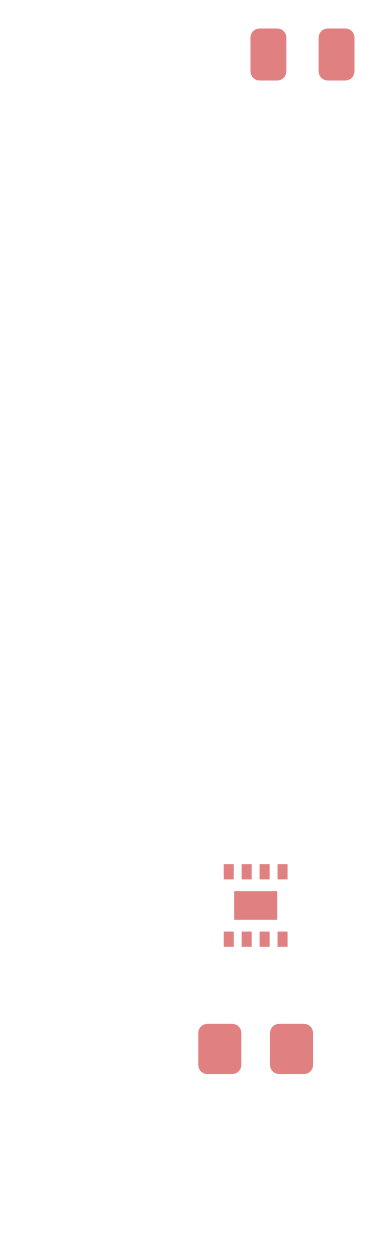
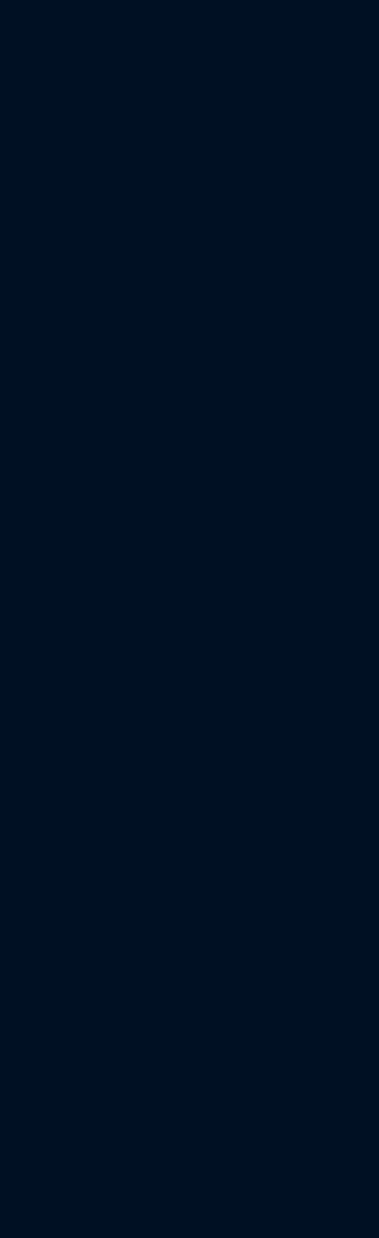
part: (302, 54) -> none
part: (255, 905) -> none
part: (255, 1048) -> none

